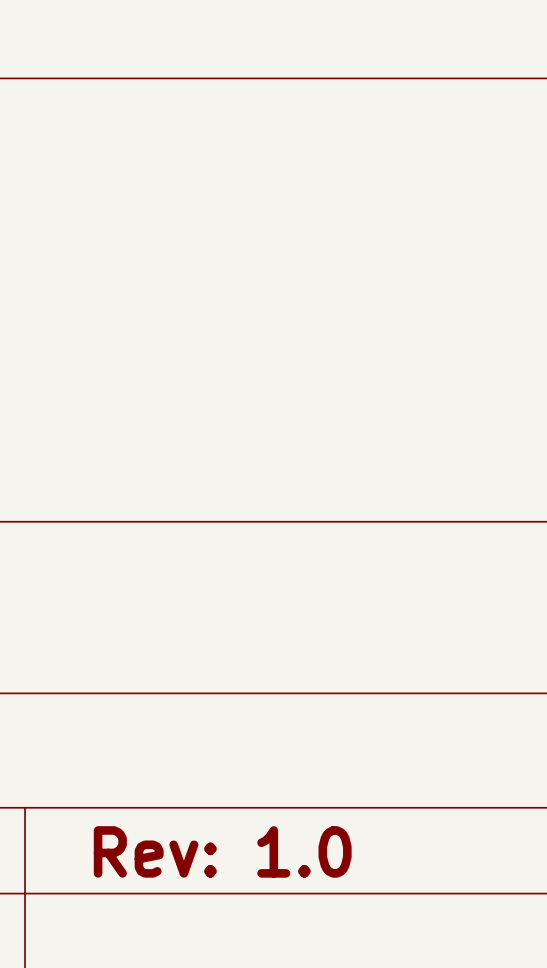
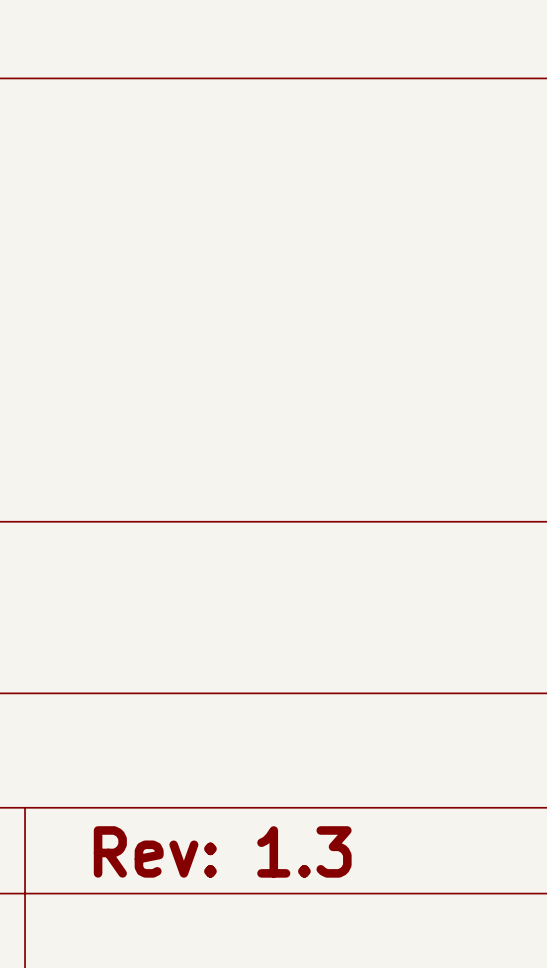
title block: Rev: 1.0 (222, 851) -> Rev: 1.3 (222, 851)

